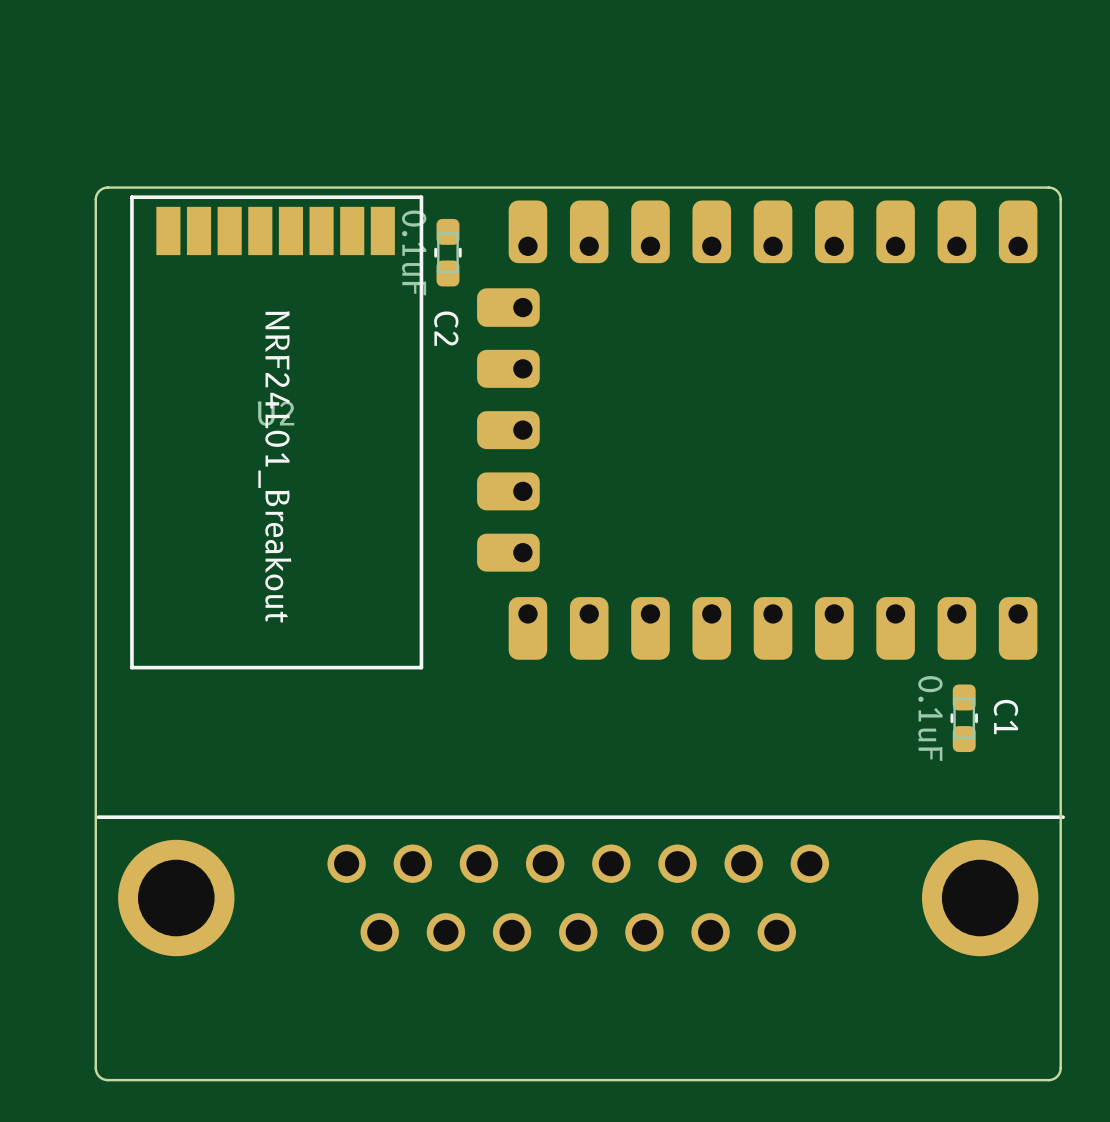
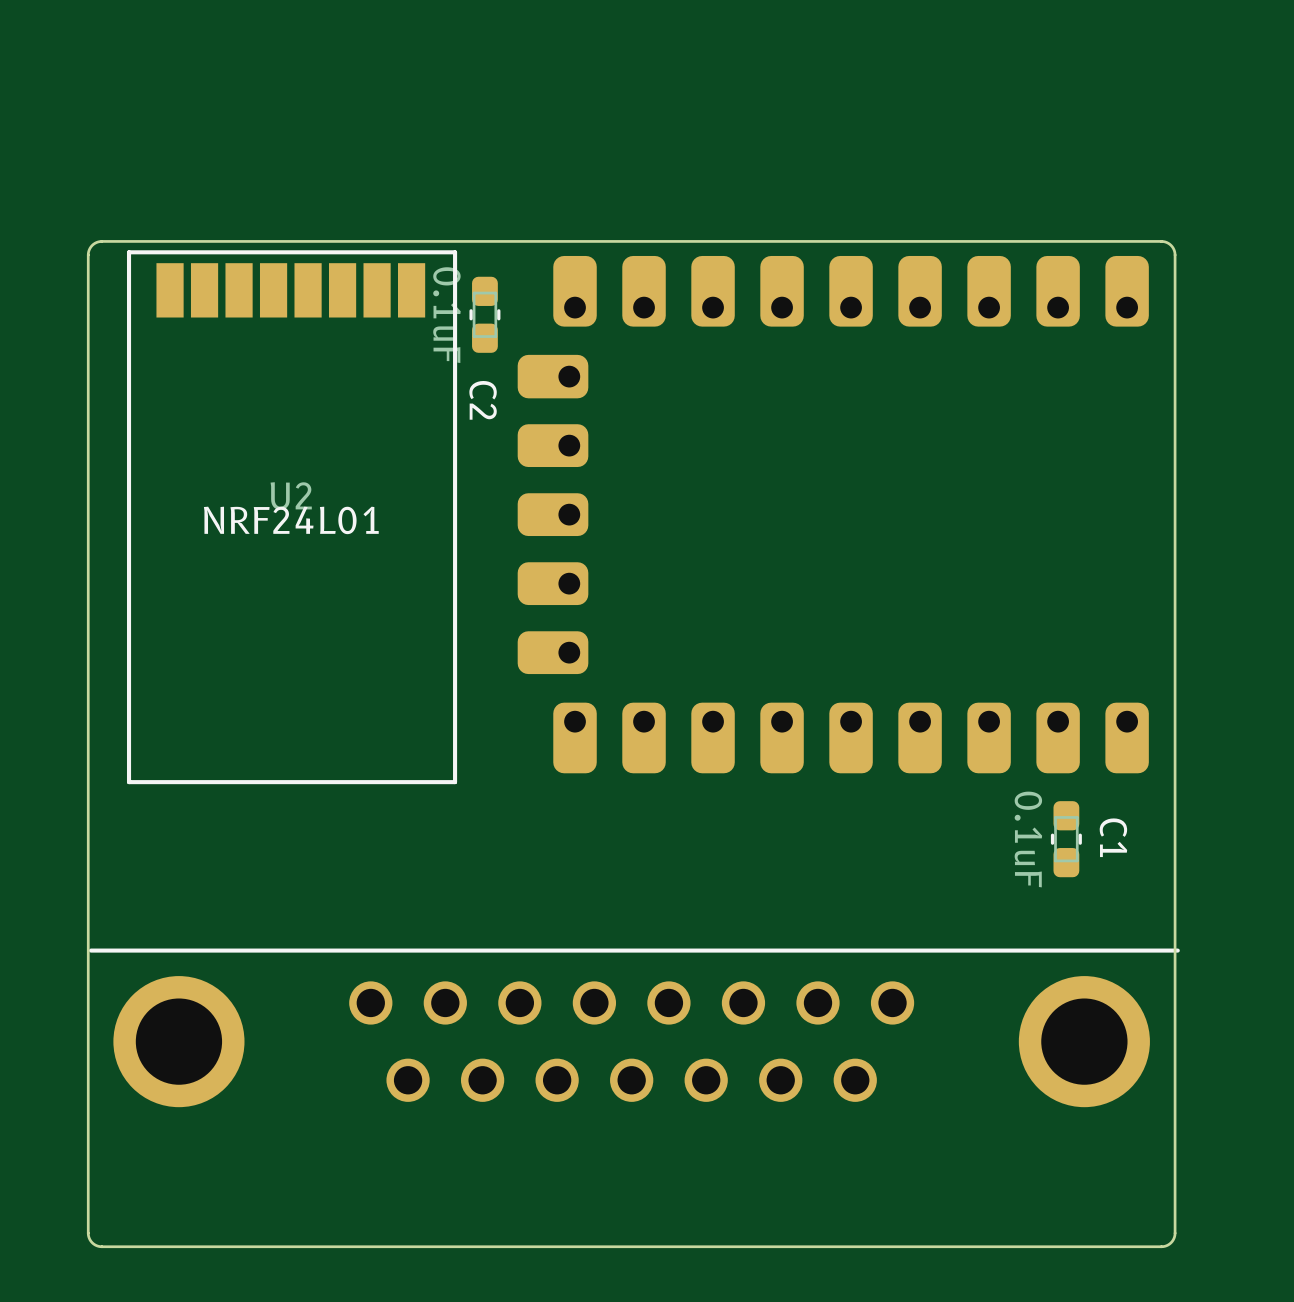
U2 value: NRF24L01_Breakout (274, 466) -> NRF24L01 (291, 520)

